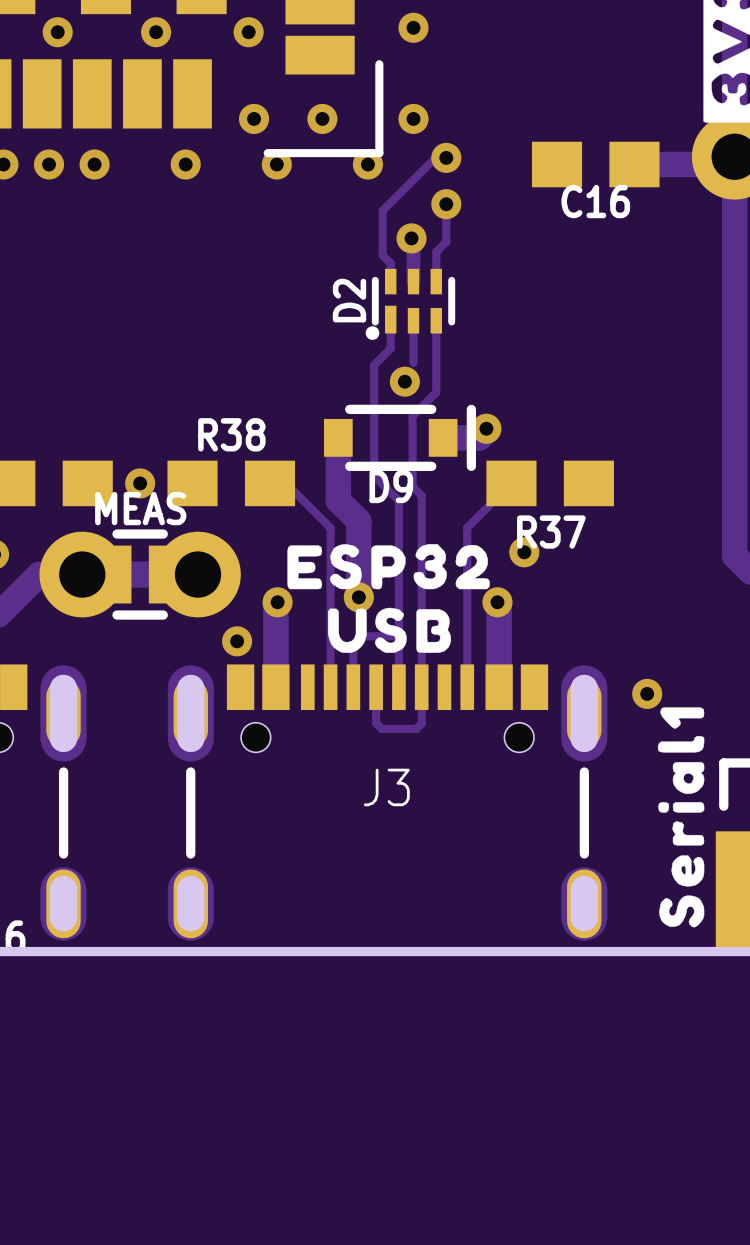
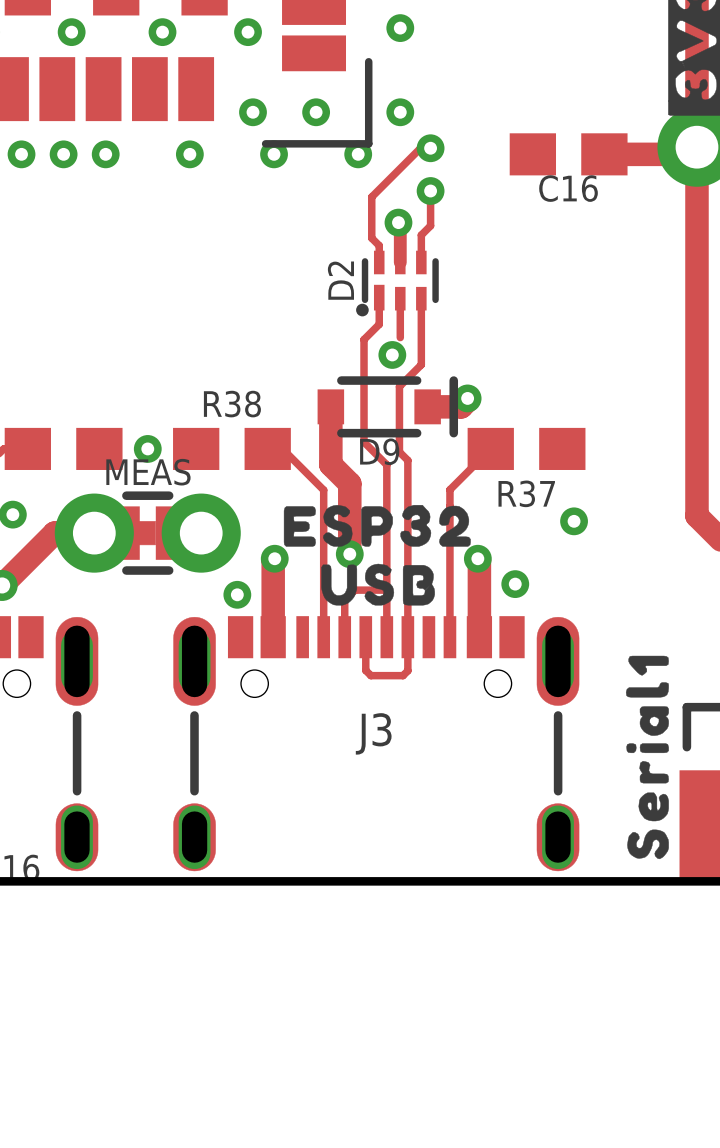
via: (524, 552) -> none
via: none -> (574, 521)
via: none -> (515, 584)
via: (647, 693) -> none

